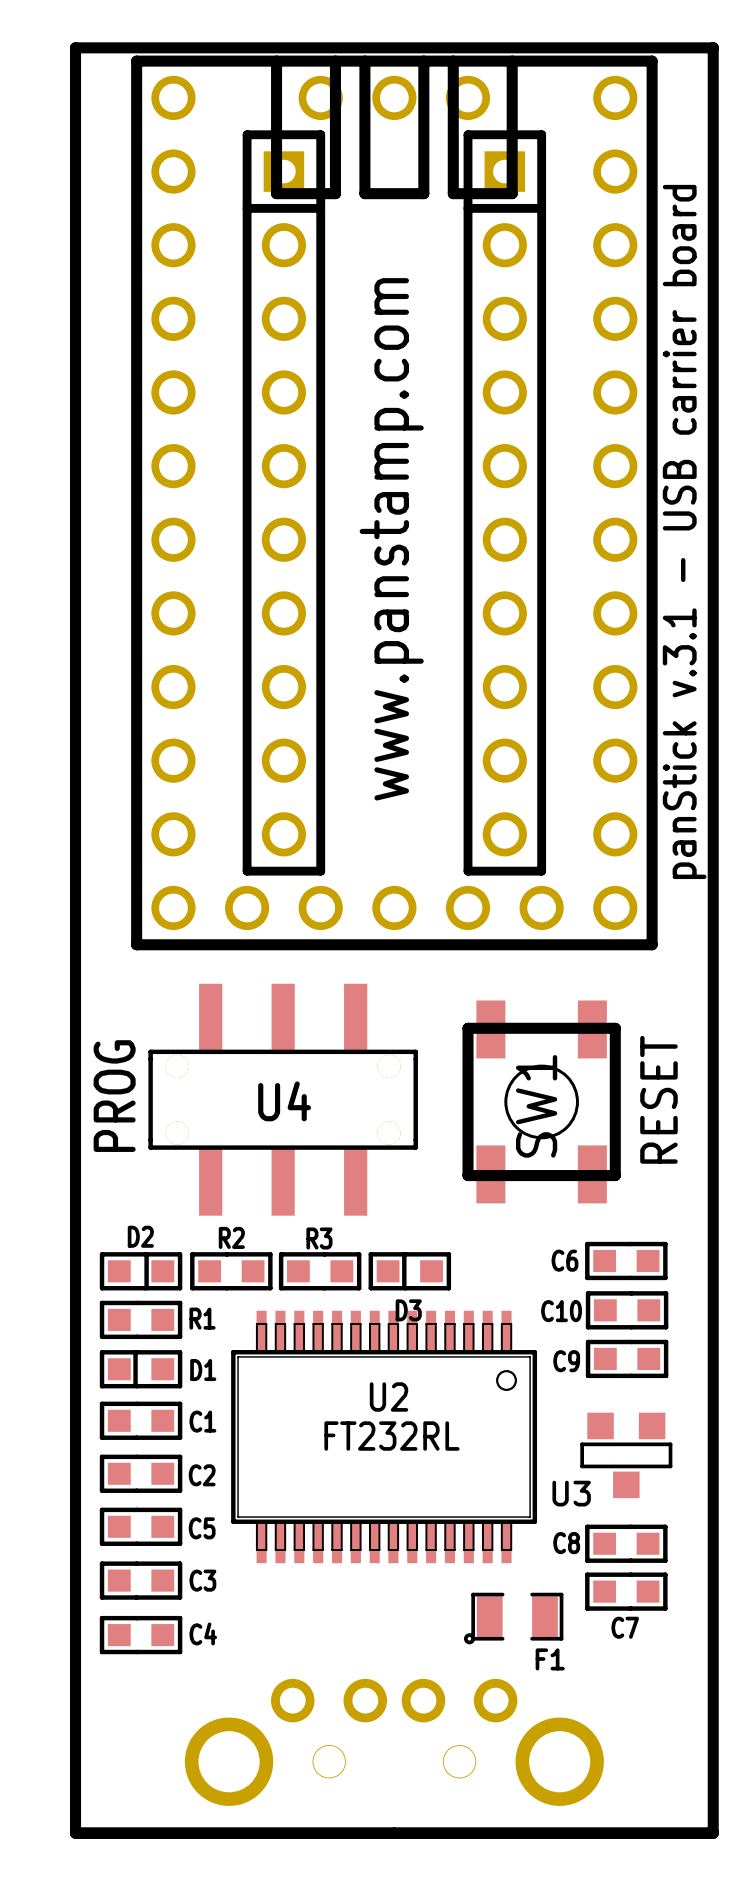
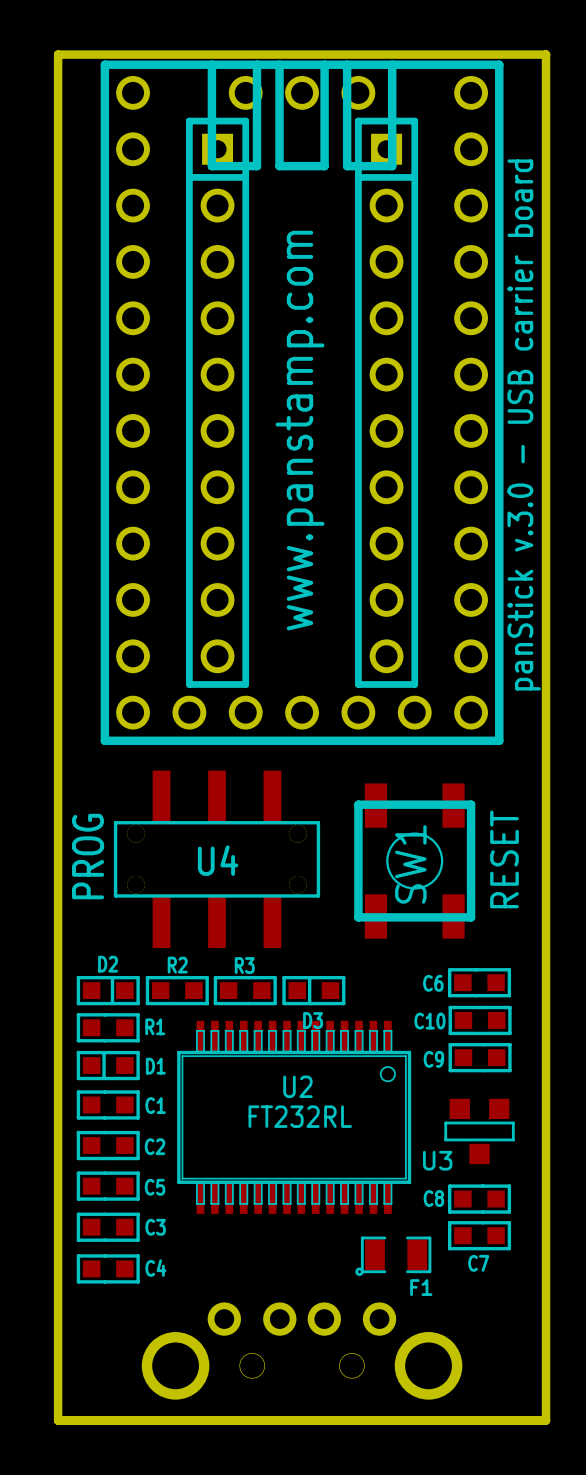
text: panStick v.3.1 - USB carrier board (684, 531) -> panStick v.3.0 - USB carrier board (524, 424)
C6 rotation: 0° (626, 1260) -> 180° (479, 982)

